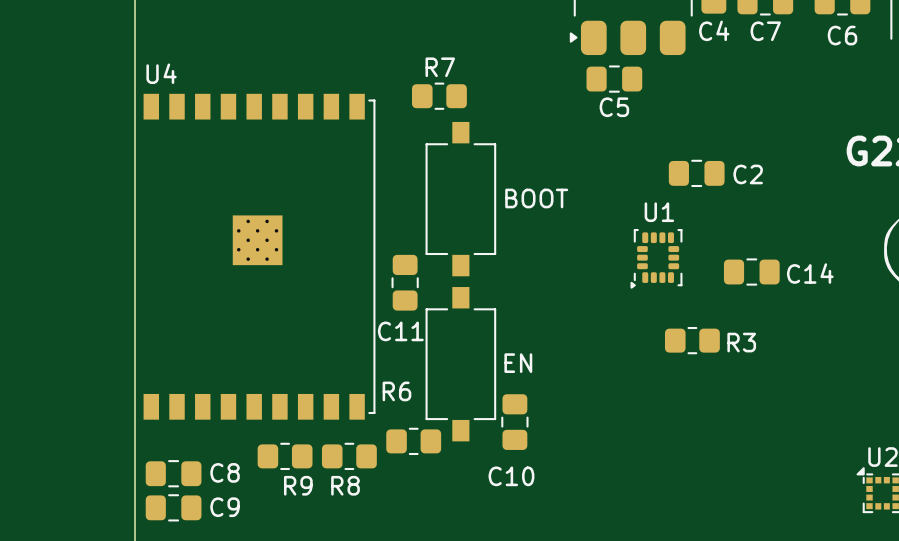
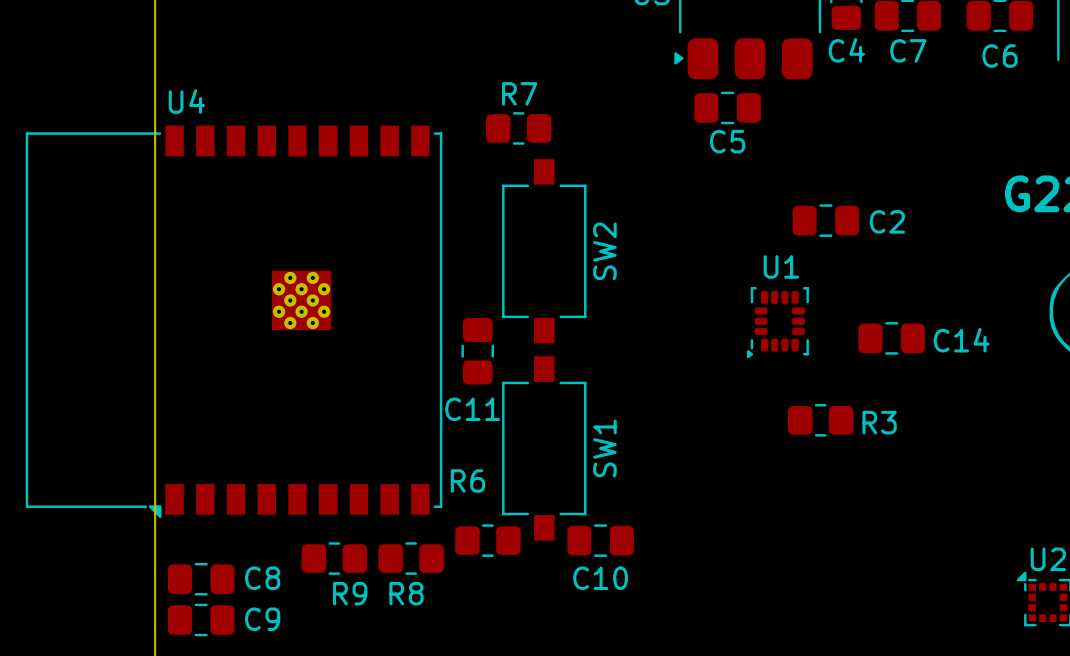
U4 footprint: [143, 93, 376, 420] -> [25, 125, 443, 518]
BOOT name: BOOT (536, 198) -> SW2 (604, 251)
EN name: EN (518, 363) -> SW1 (604, 448)
C10 rotation: 0° (514, 422) -> 90° clockwise (600, 540)

